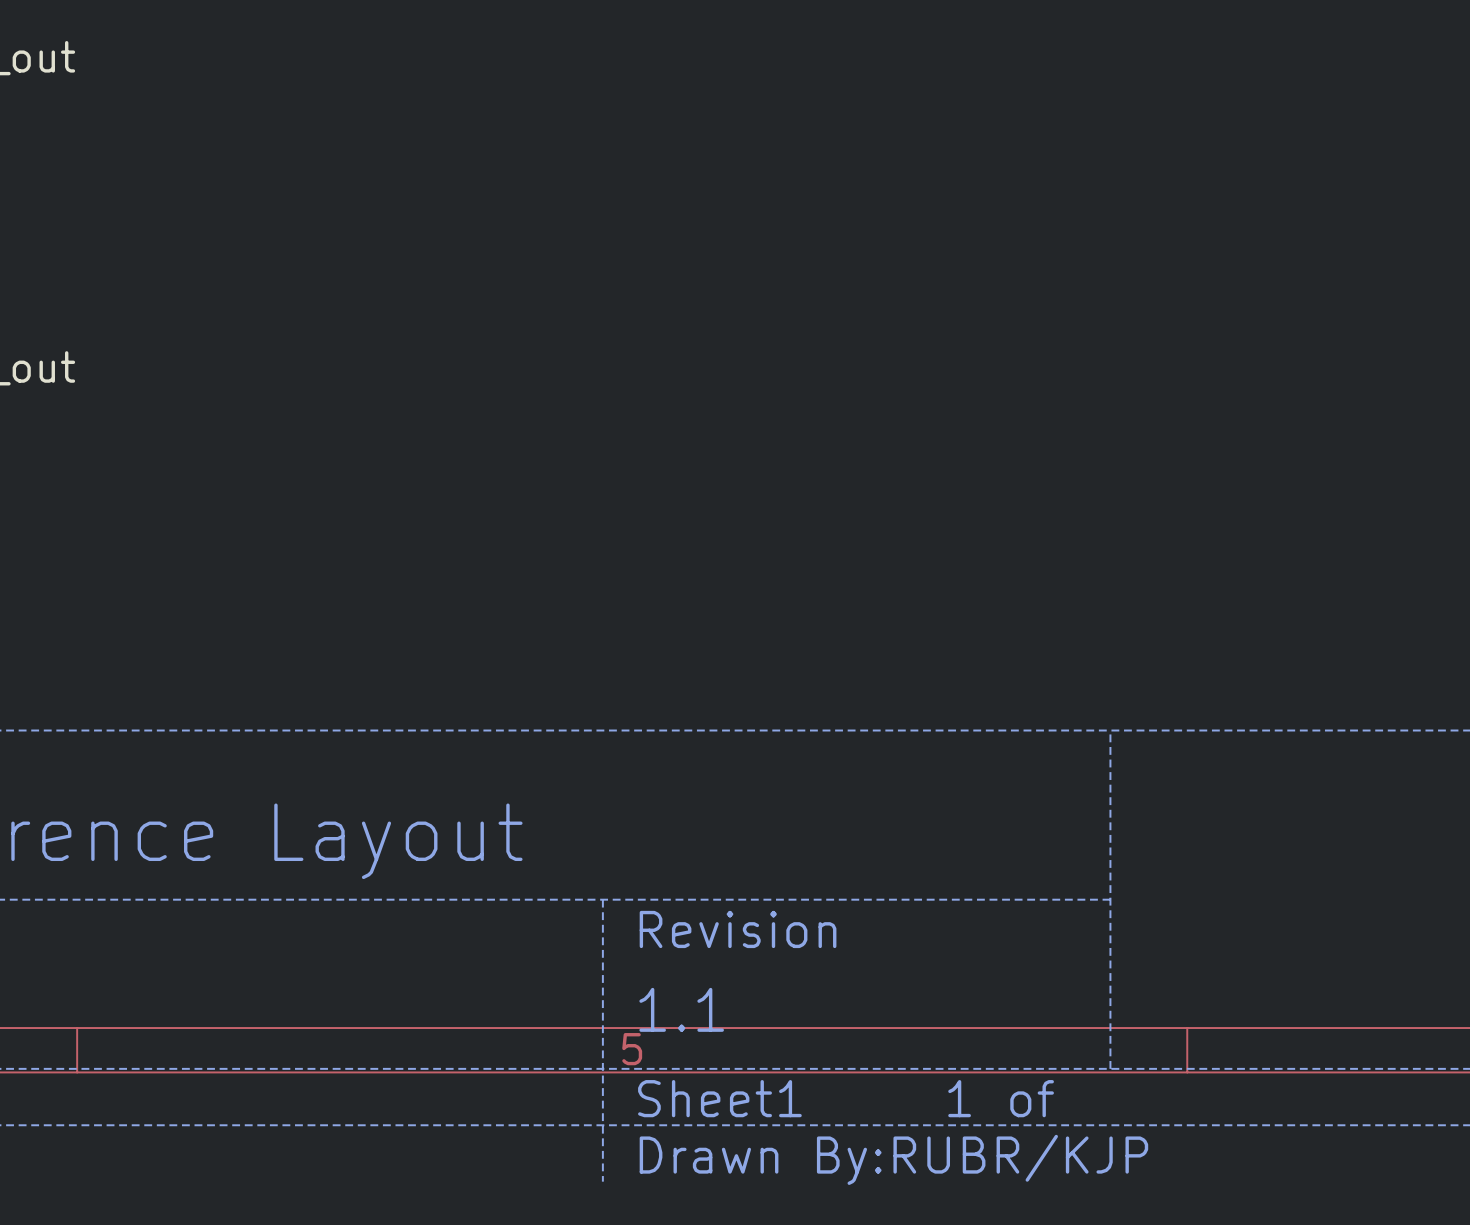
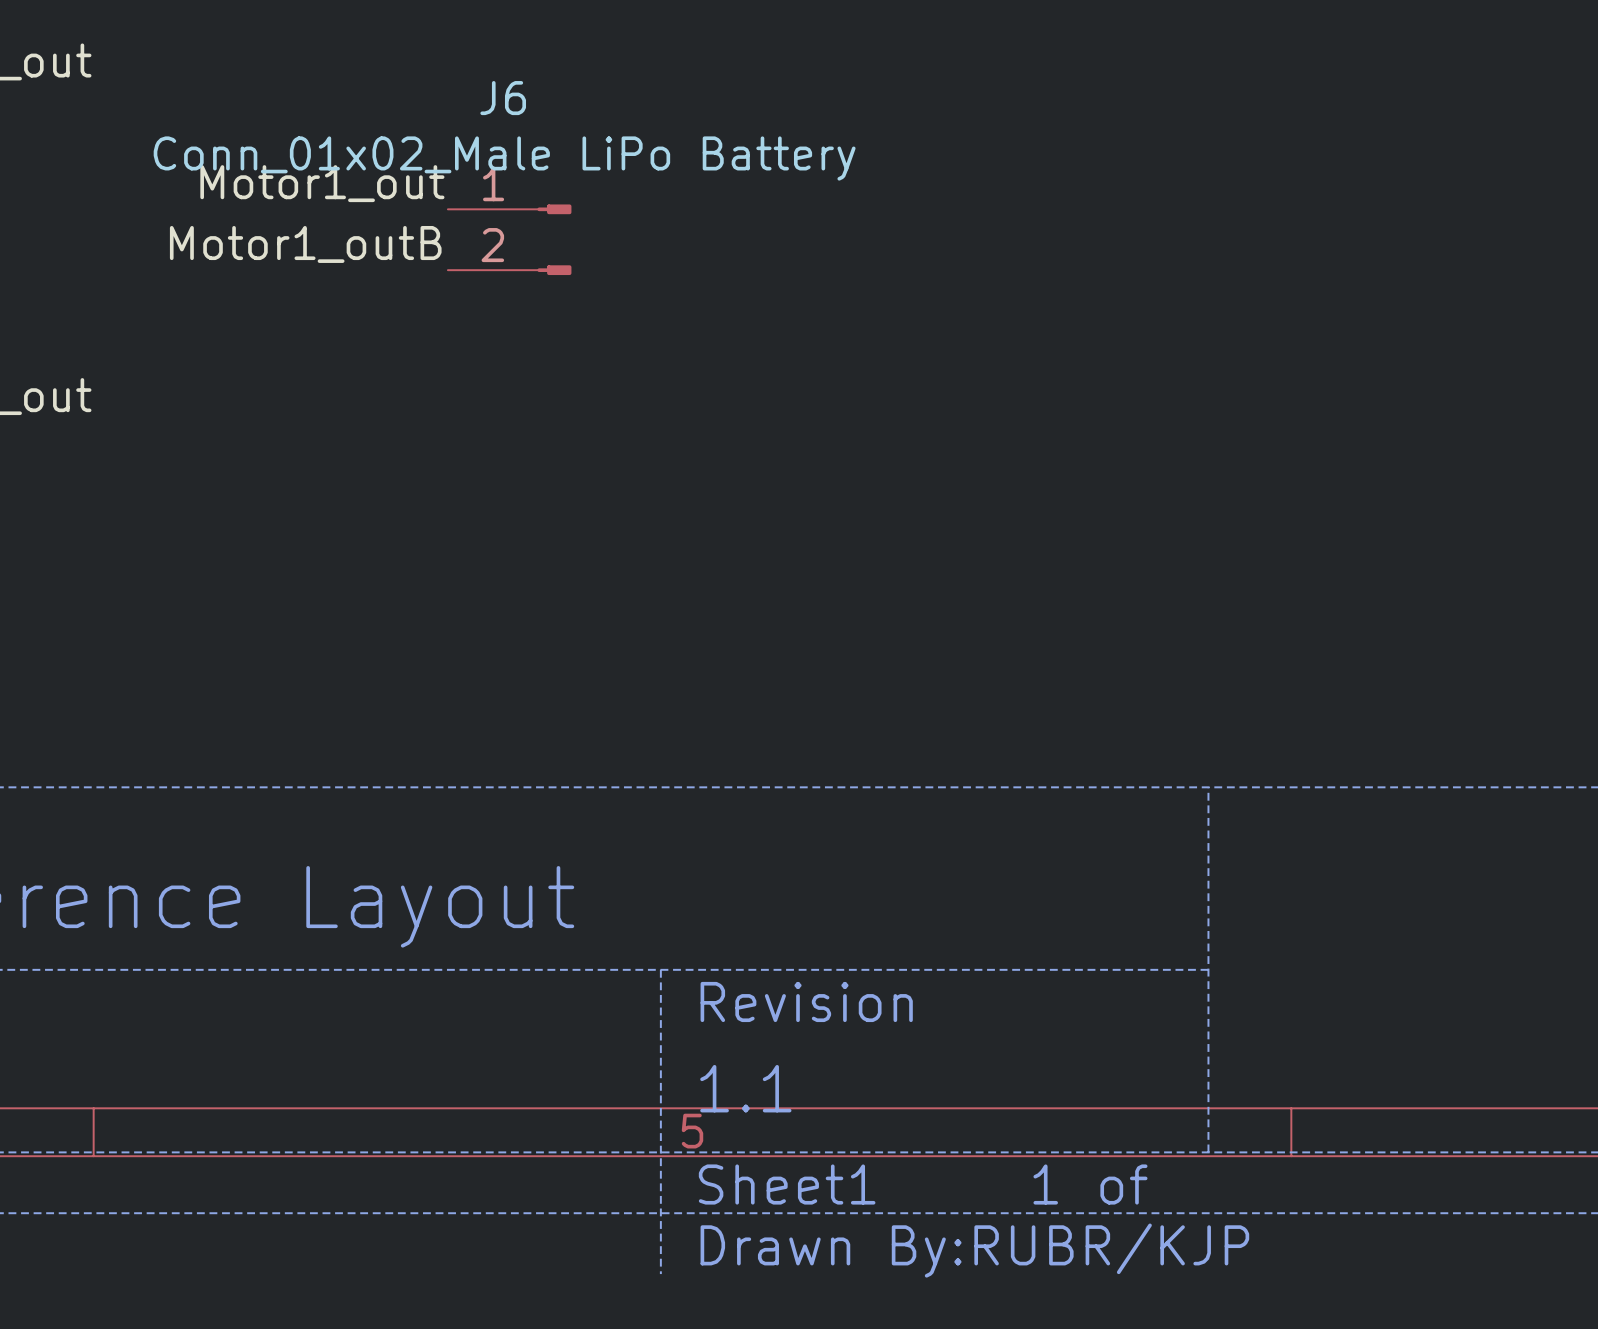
label: none -> Motor1_out (322, 183)
J6: none -> Conn_01x02_Male LiPo Battery (509, 239)
label: none -> Motor1_outB (305, 244)

